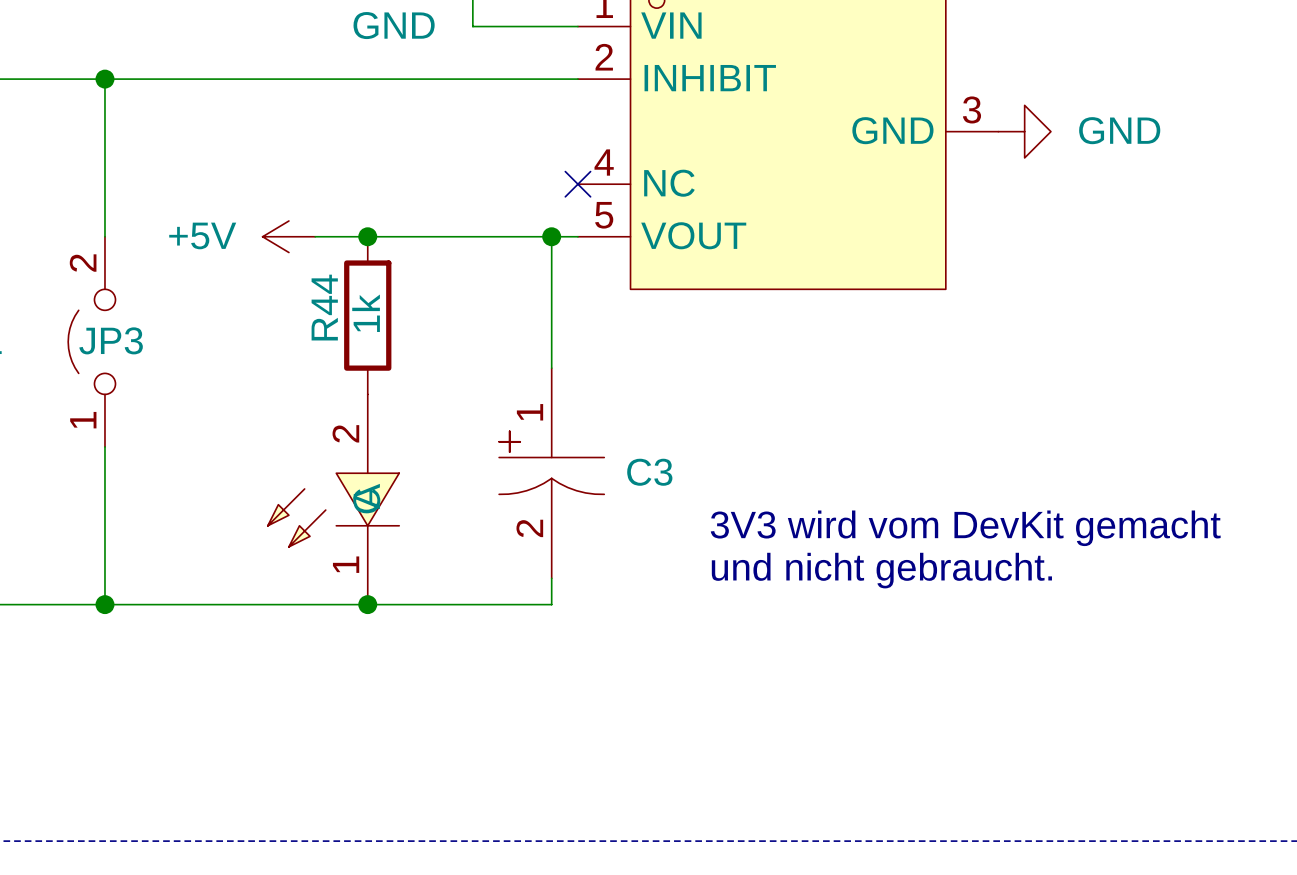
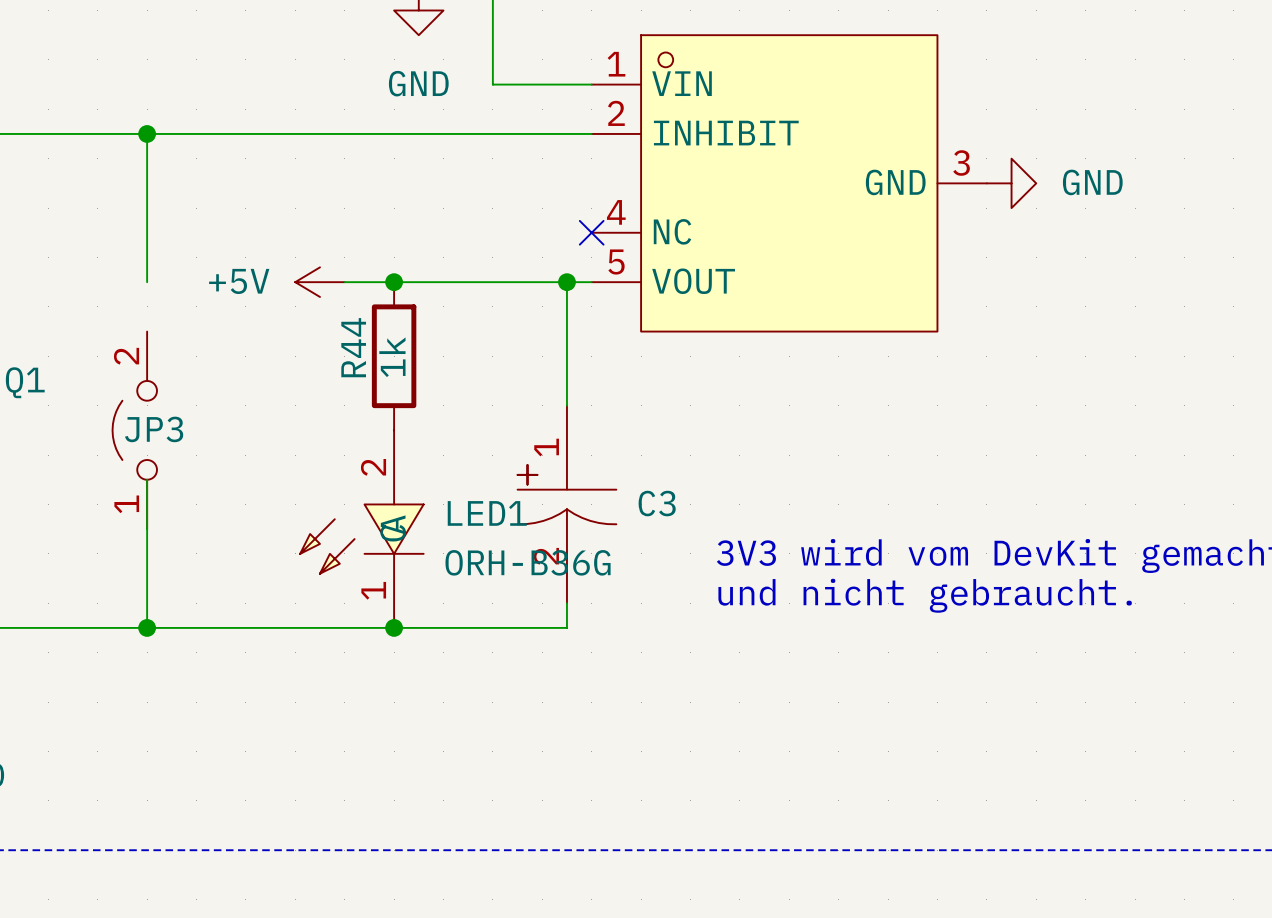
JP3 position: (91, 341) -> (134, 430)
LED1 name: none -> LED1 (487, 513)
LED1 value: none -> ORH-B36G (528, 562)

